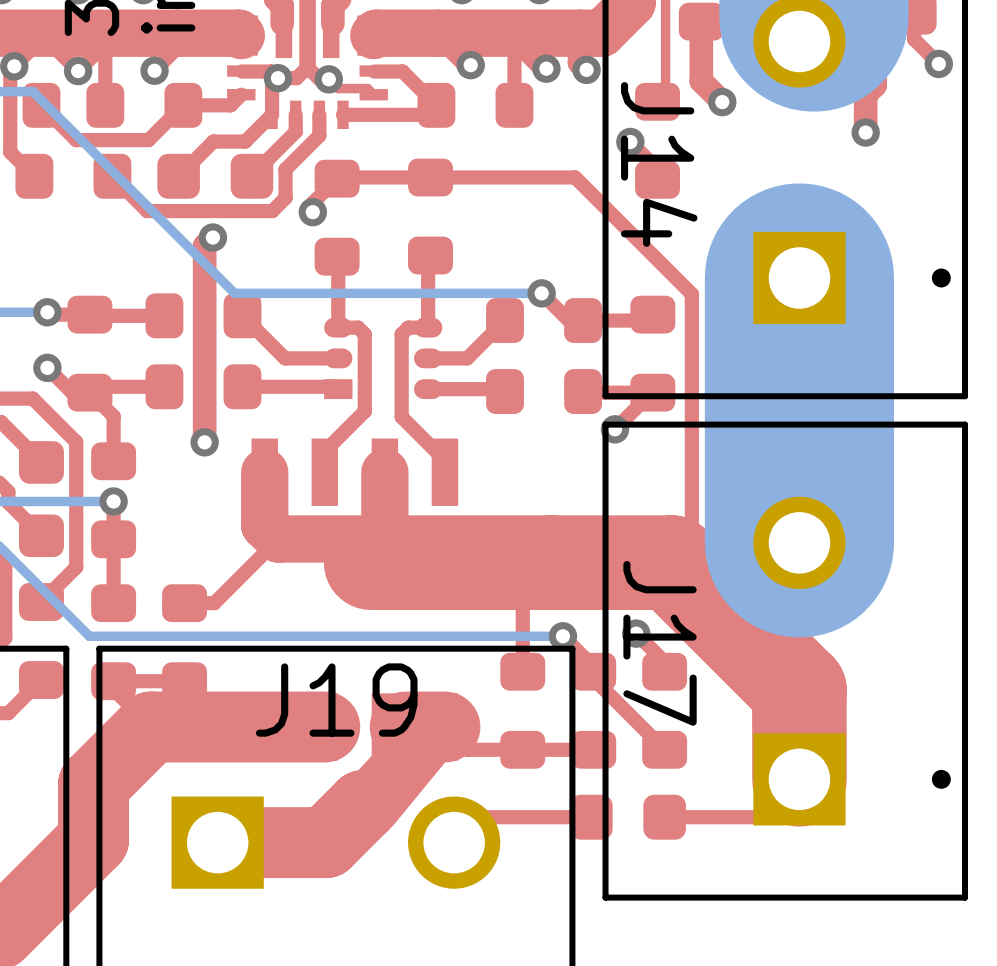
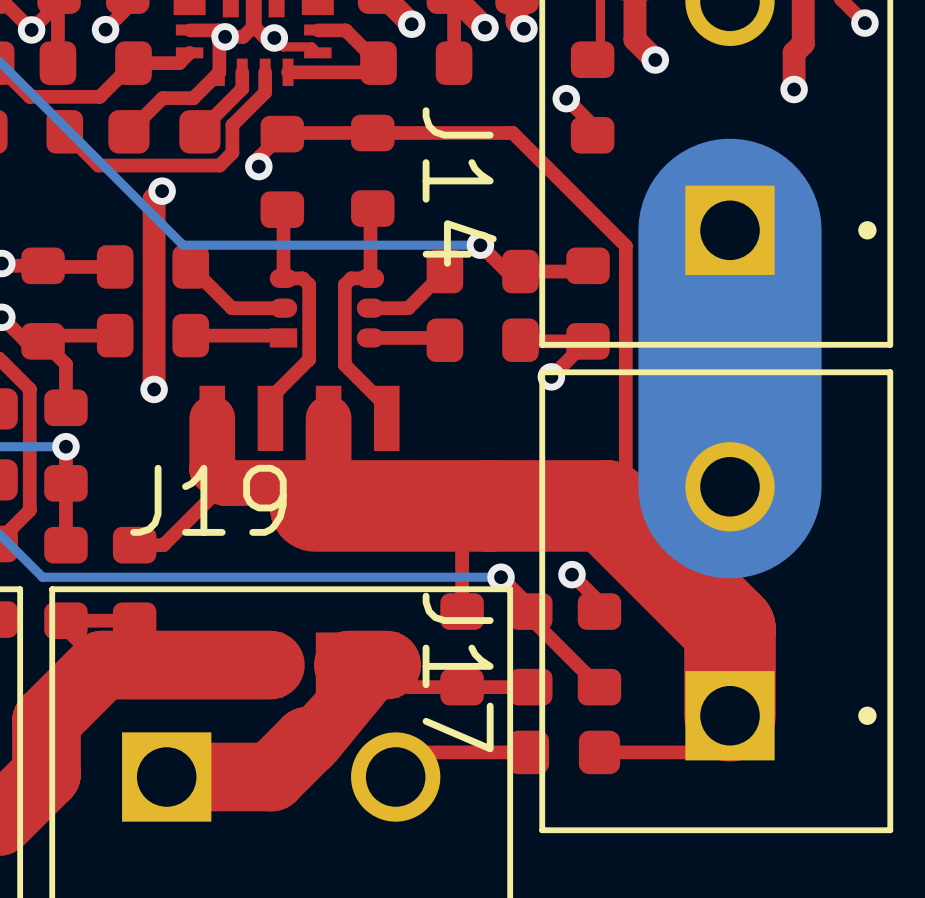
J14 name position: J14 (659, 164) -> J14 (459, 187)
J17 name position: J17 (660, 643) -> J17 (458, 672)
J19 name position: J19 (336, 700) -> J19 (208, 500)

